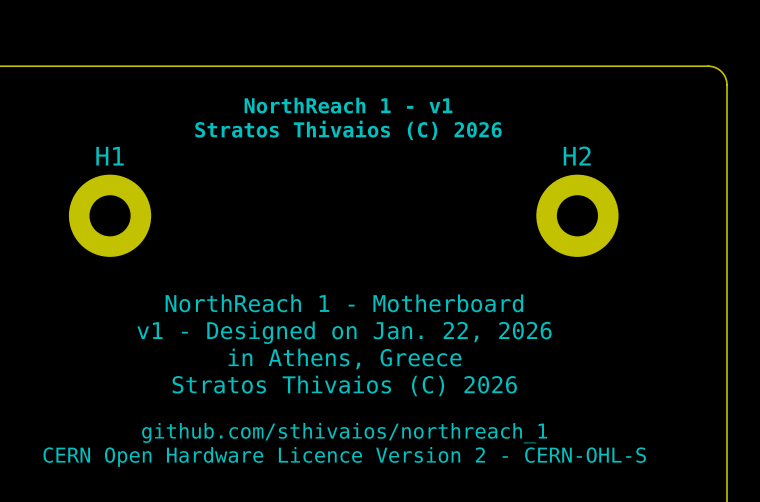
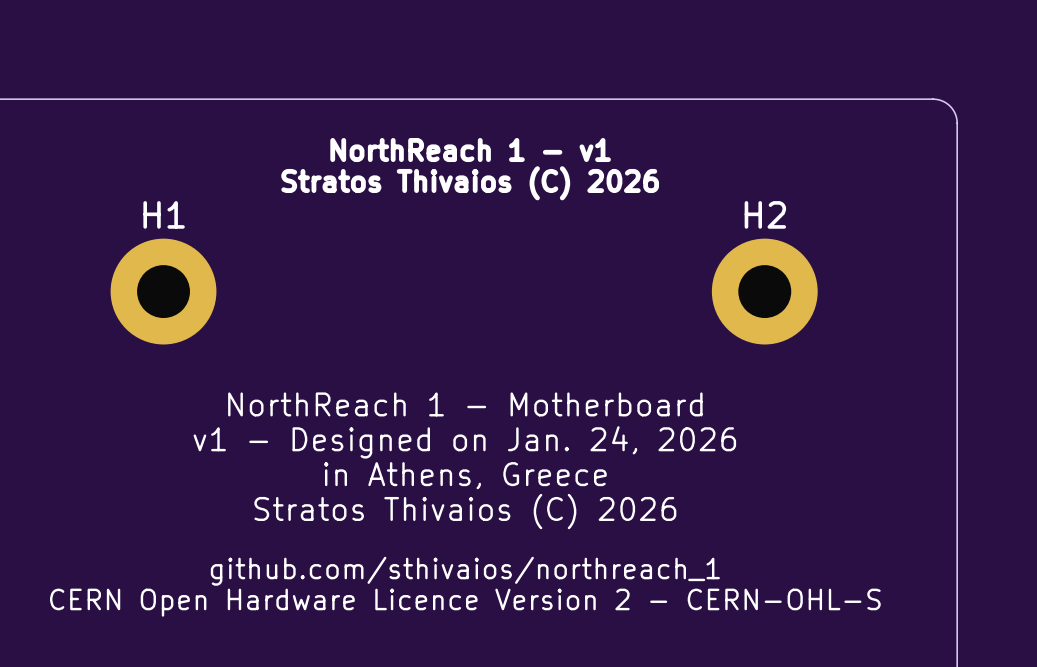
text: v1 - Designed on Jan. 22, 2026 (344, 332) -> v1 - Designed on Jan. 24, 2026 (464, 442)

